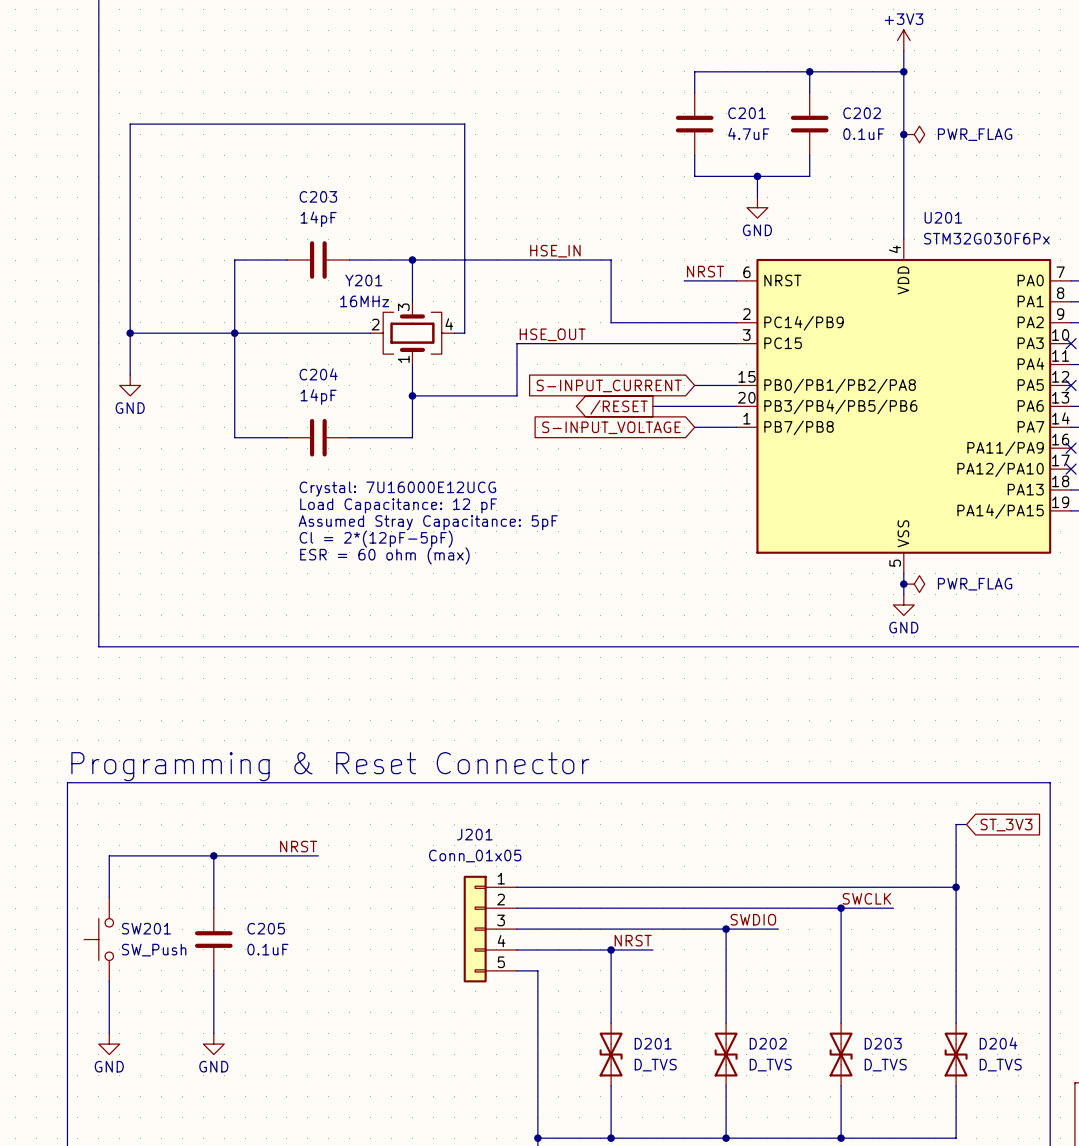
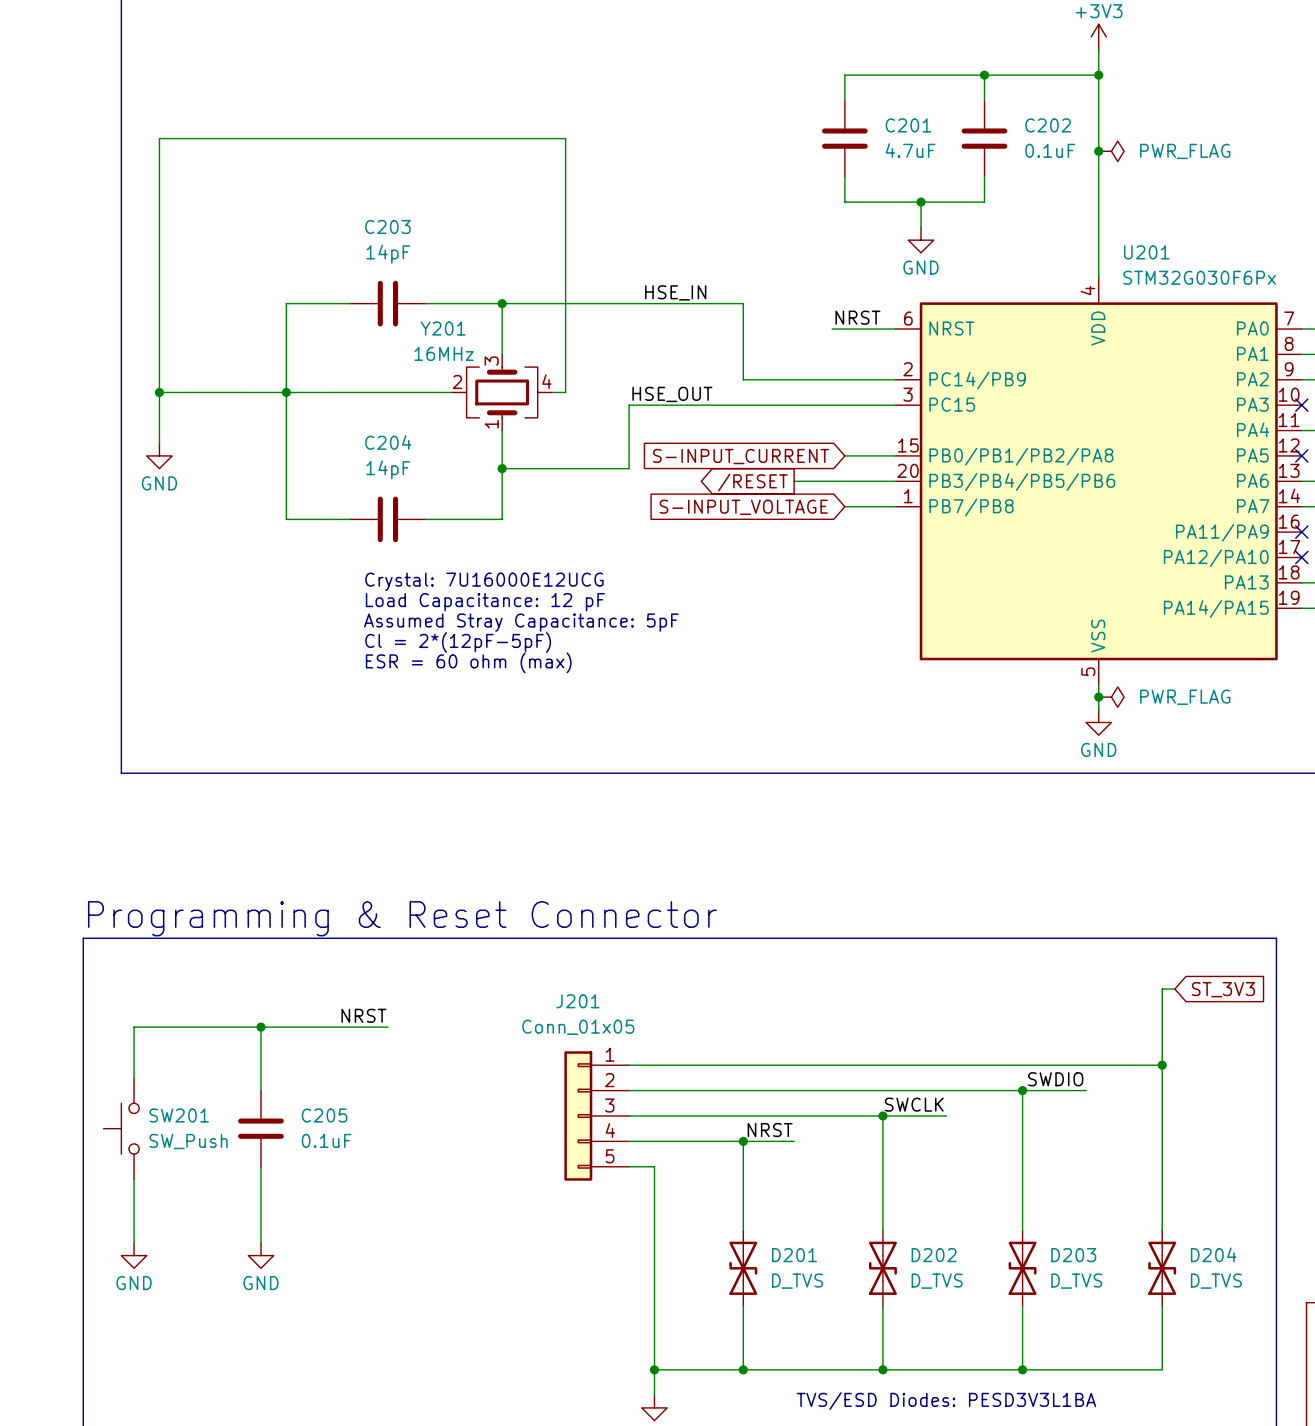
label: SWCLK (866, 898) -> SWDIO (1055, 1079)
label: SWDIO (753, 919) -> SWCLK (914, 1104)

